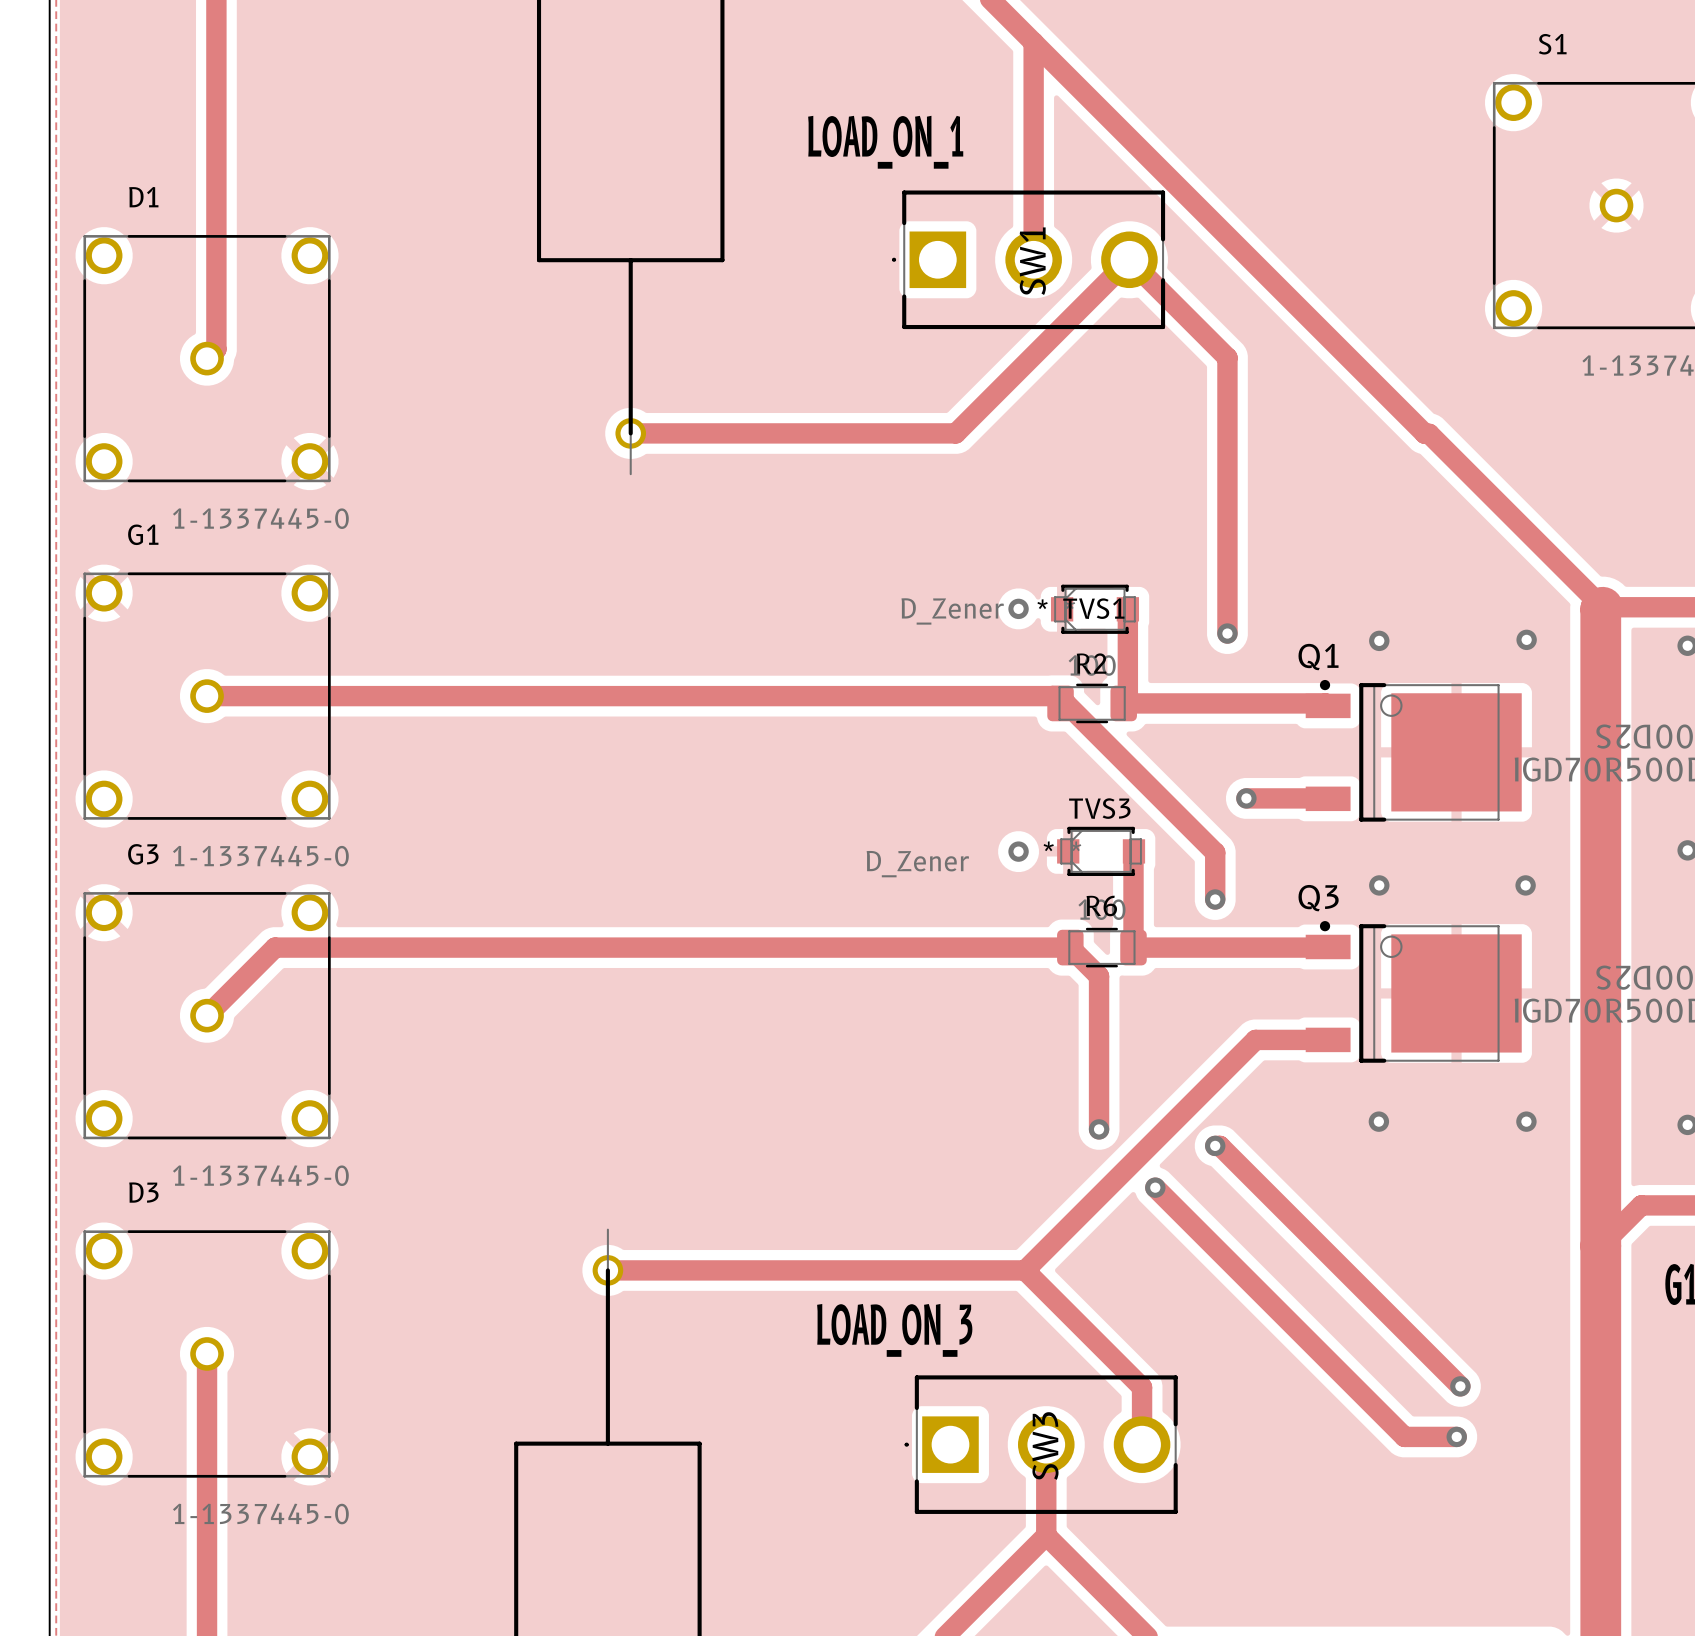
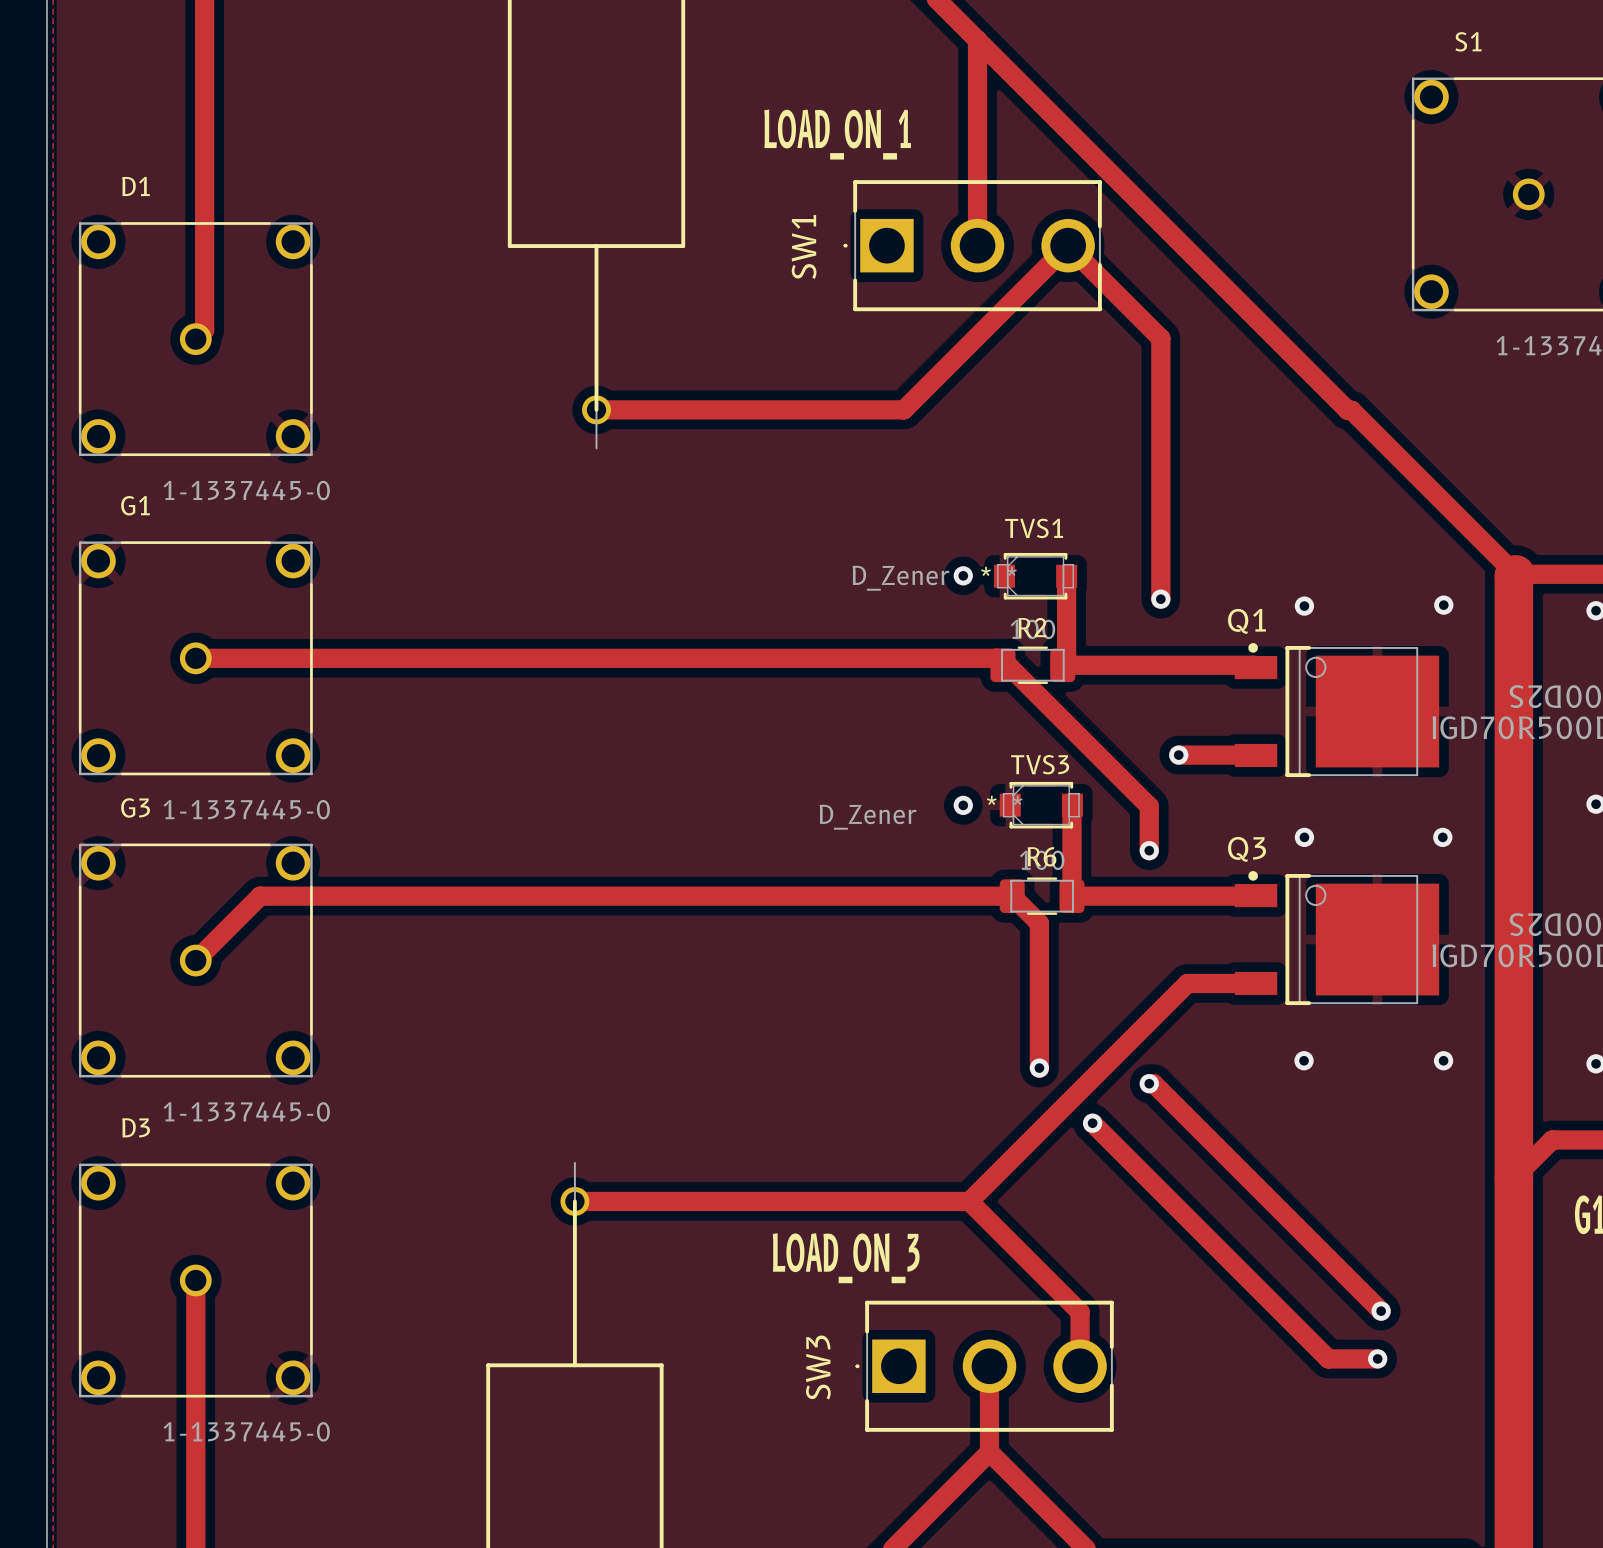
SW1 name position: SW1 (1032, 261) -> SW1 (804, 247)
TVS1 name position: TVS1 (1093, 608) -> TVS1 (1034, 528)
SW3 name position: SW3 (1045, 1446) -> SW3 (818, 1367)

